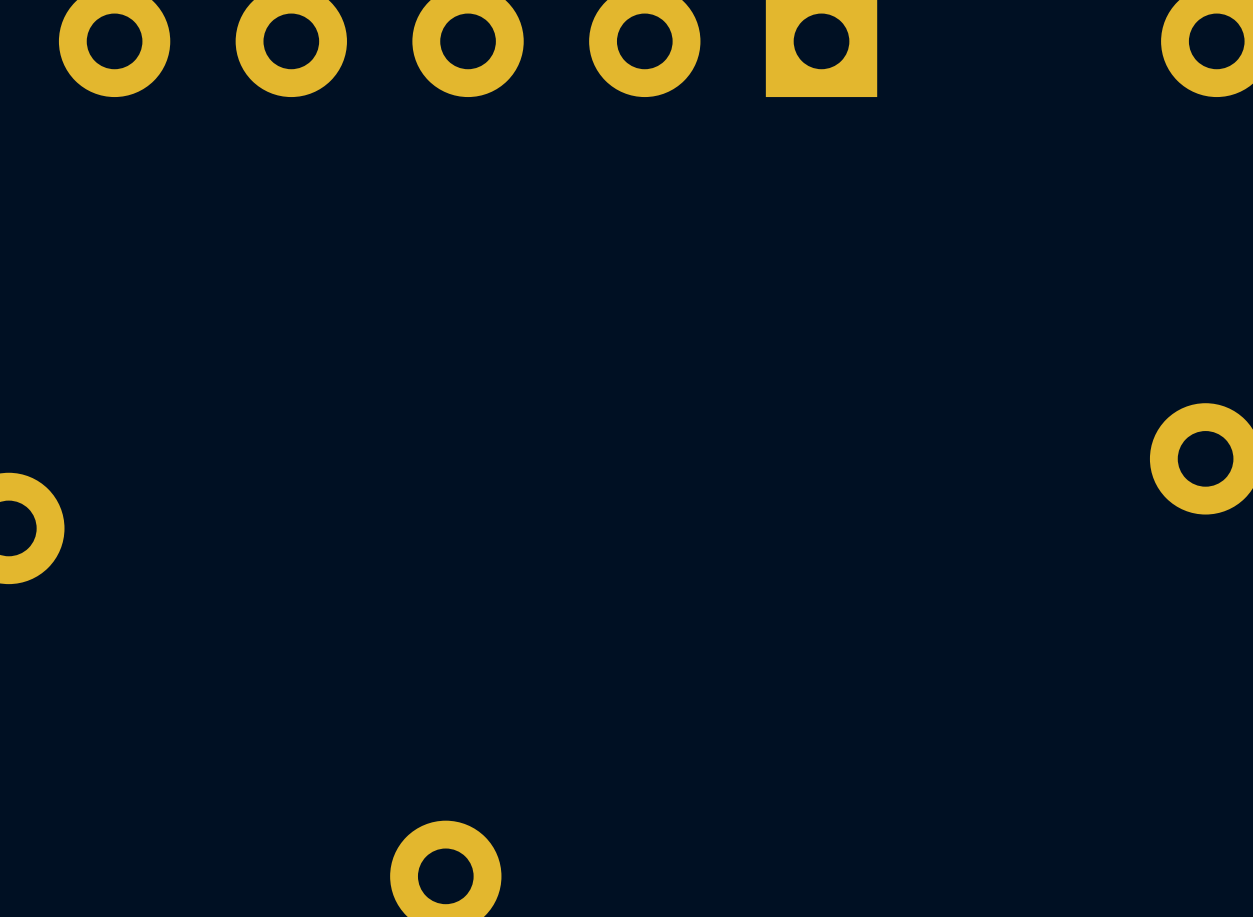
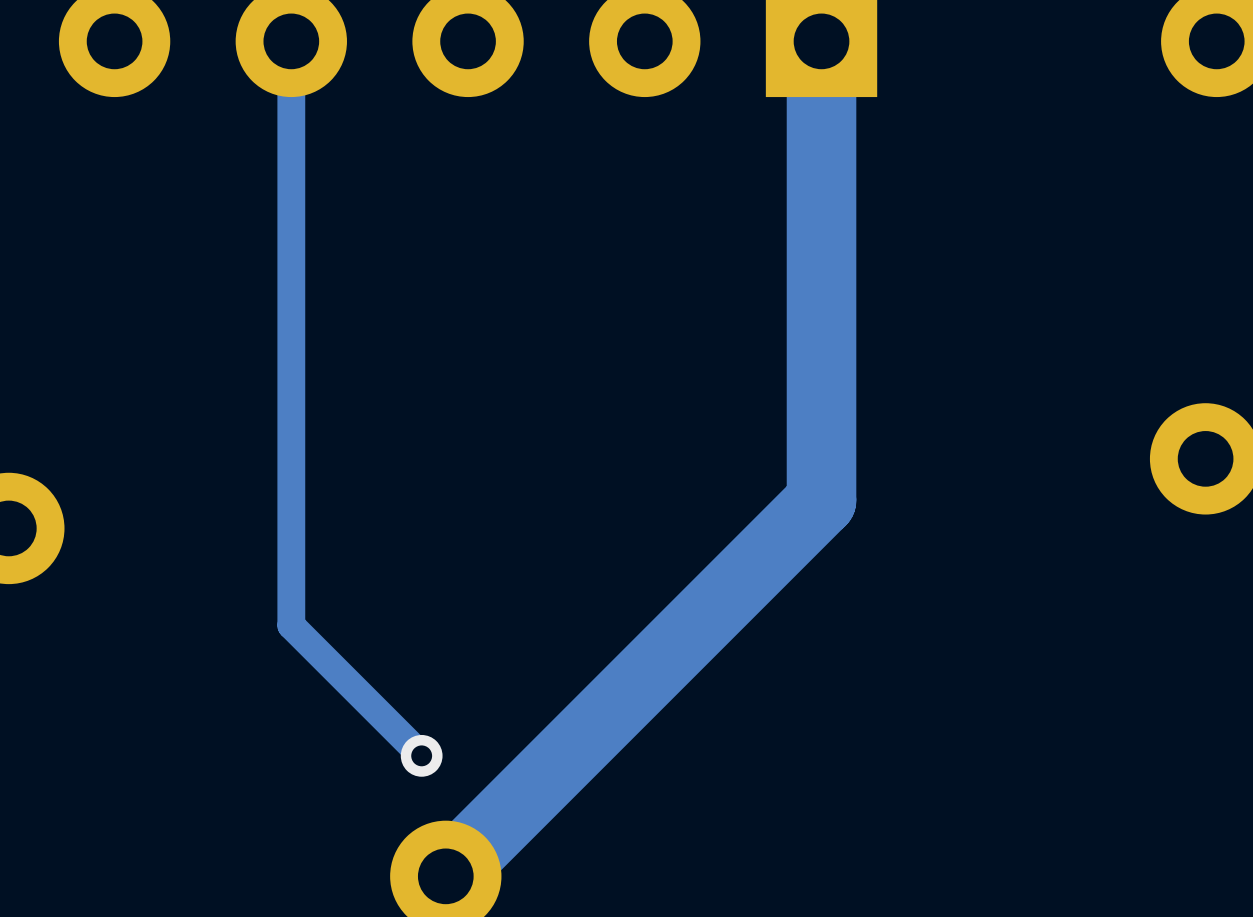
track: none -> (291, 41) (291, 625) (421, 755)
track: none -> (821, 41) (821, 500) (445, 876)
via: none -> (421, 755)

